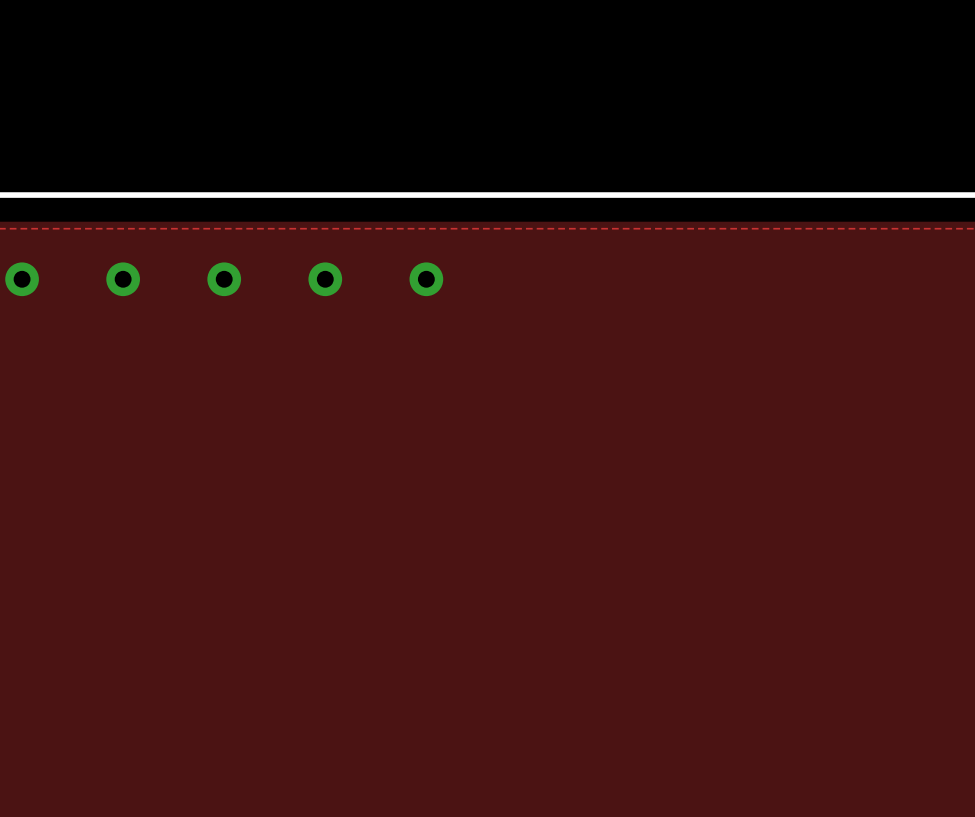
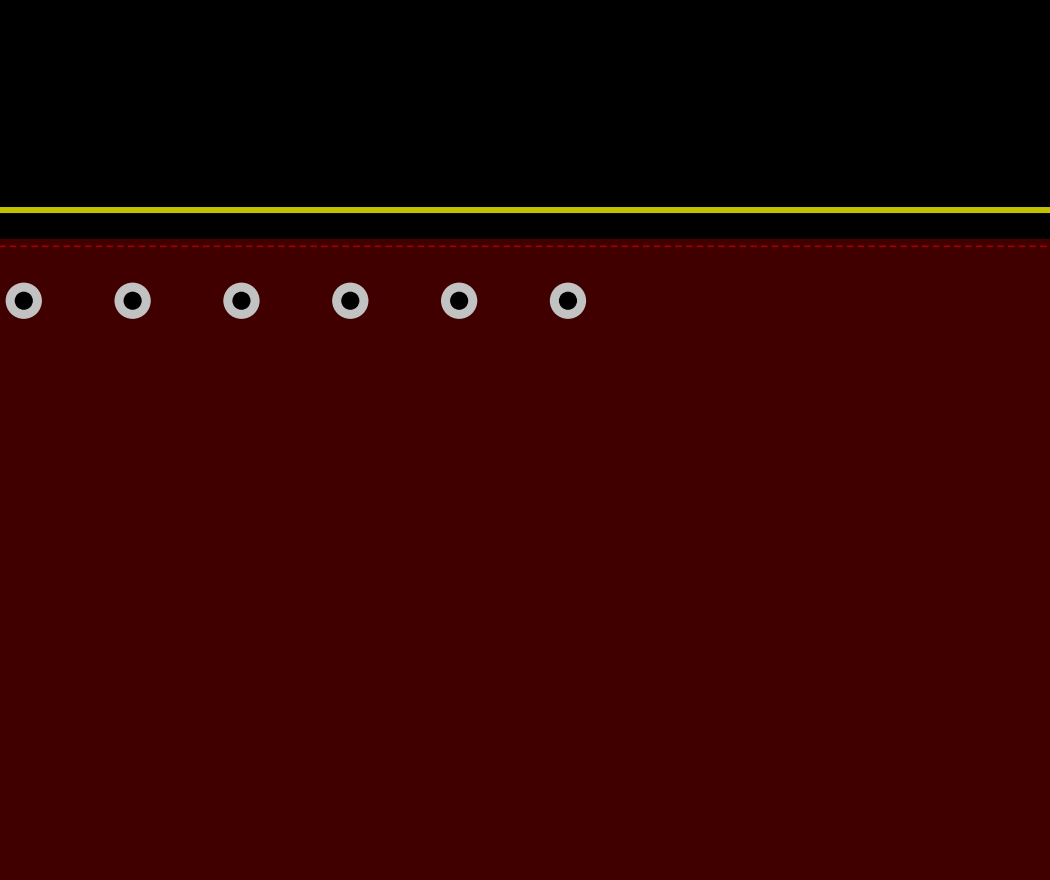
via: none -> (567, 300)

